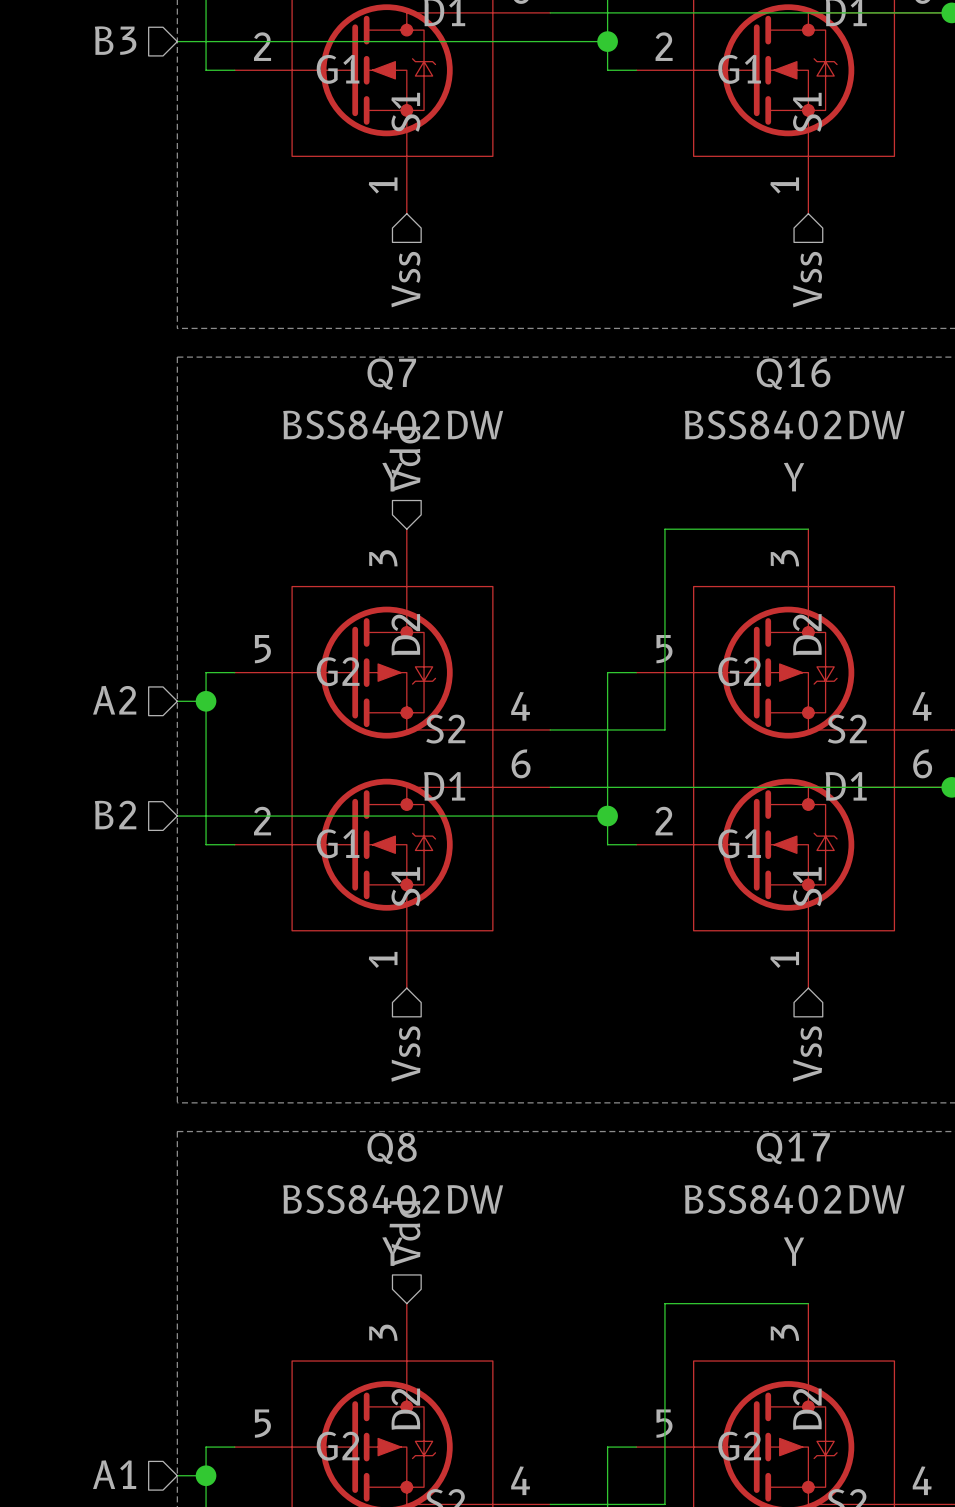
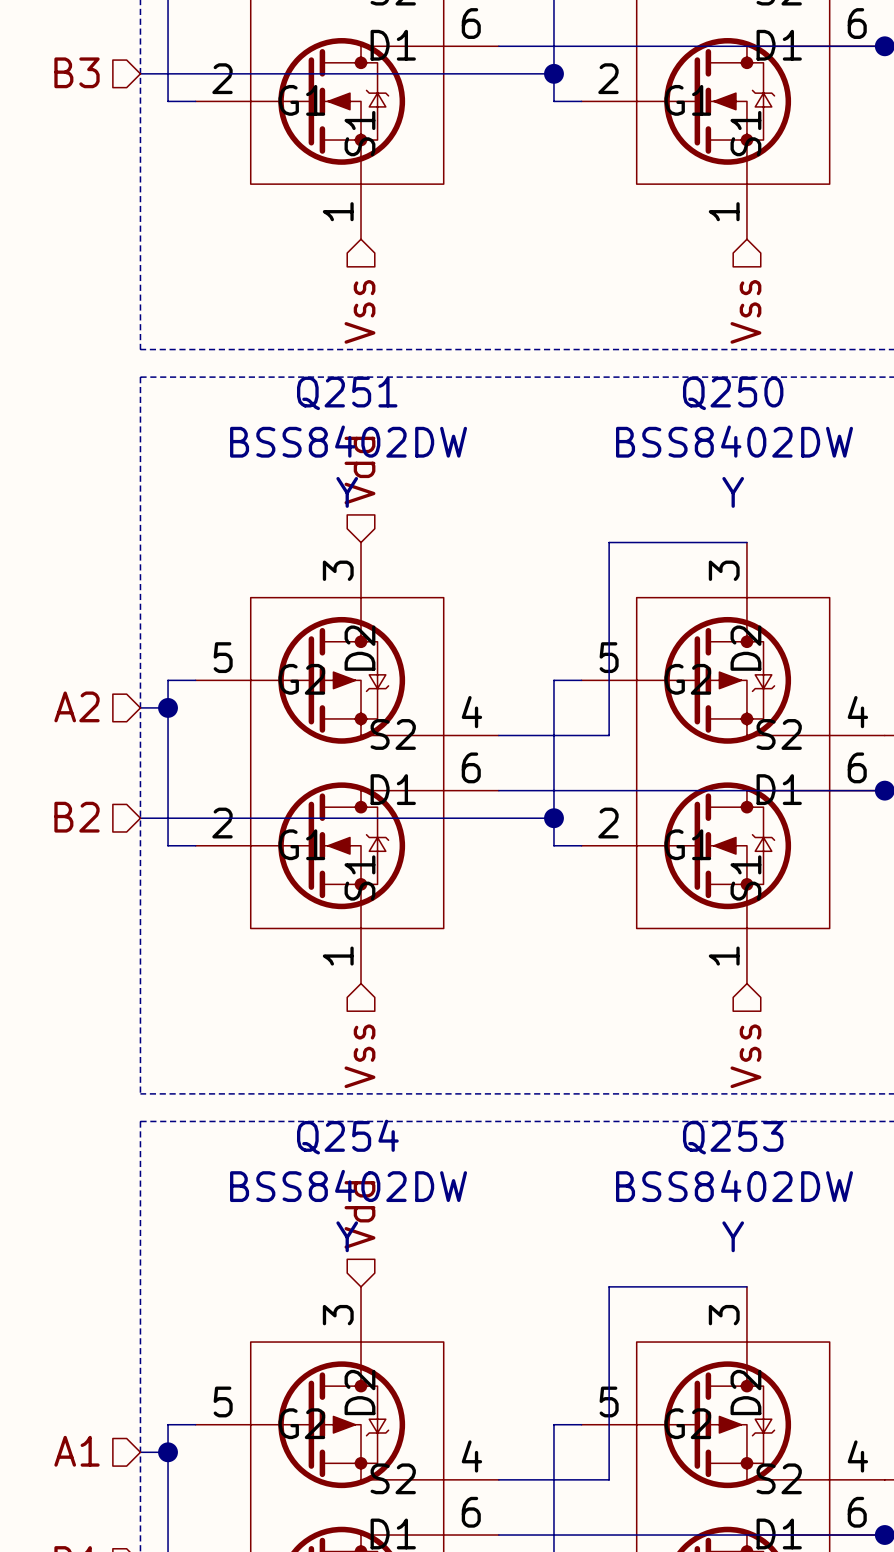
Q7 name: Q7 (391, 374) -> Q251 (347, 393)
Q16 name: Q16 (793, 374) -> Q250 (733, 393)
Q8 name: Q8 (392, 1148) -> Q254 (347, 1137)
Q17 name: Q17 (793, 1148) -> Q253 (733, 1137)

